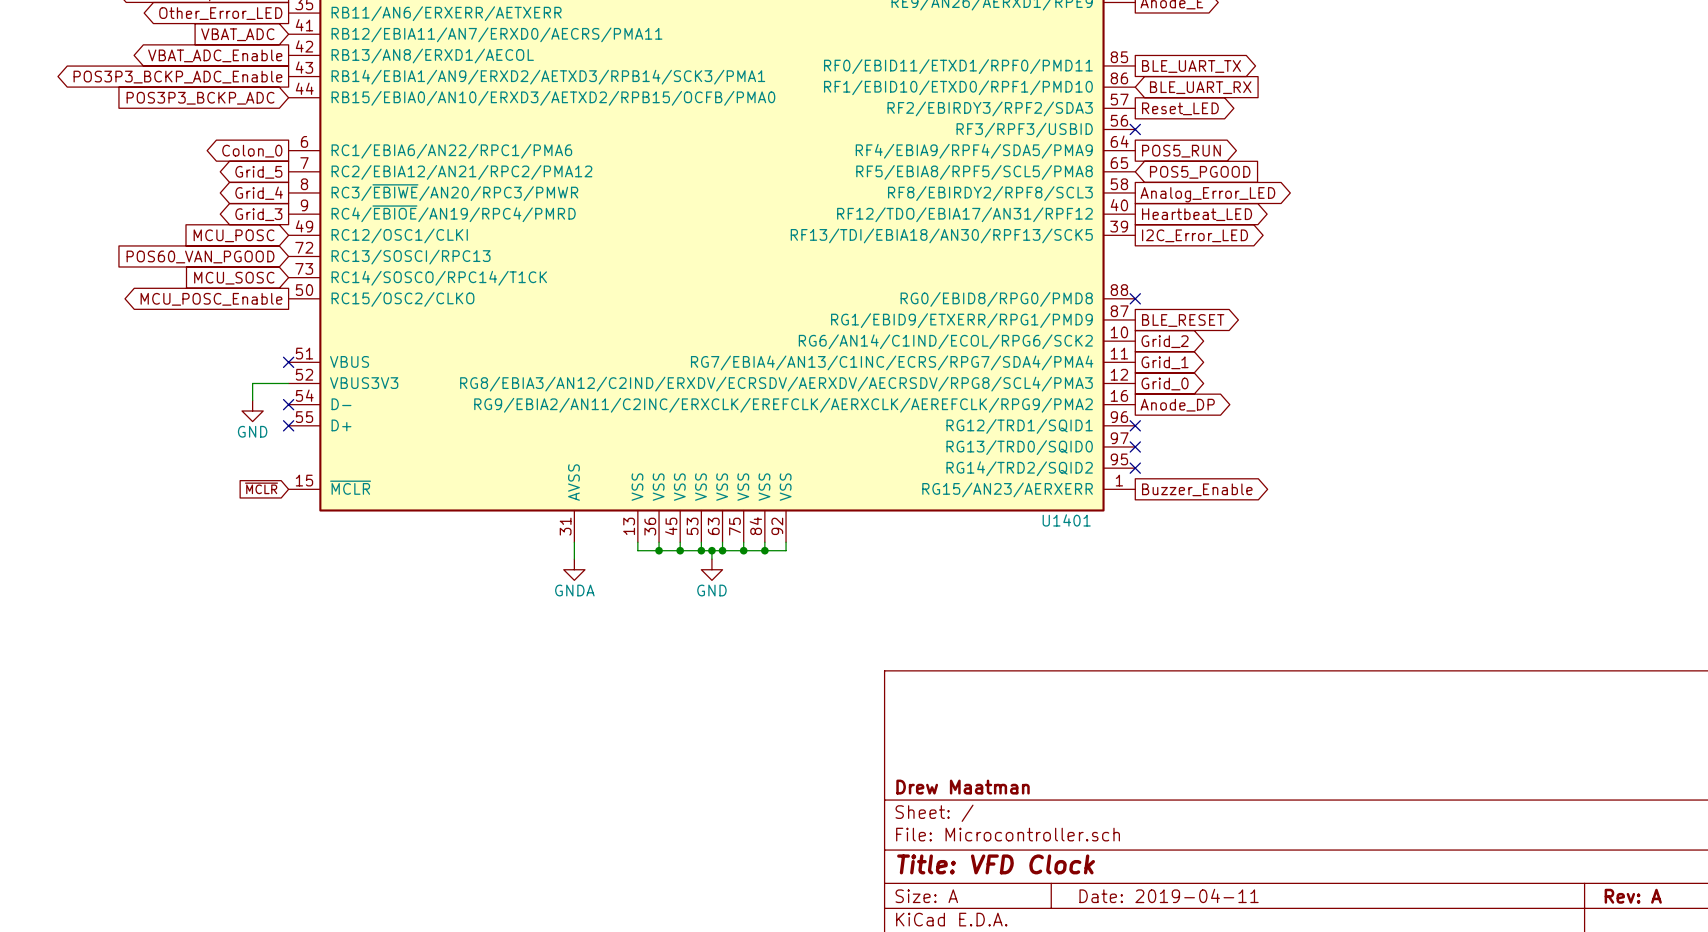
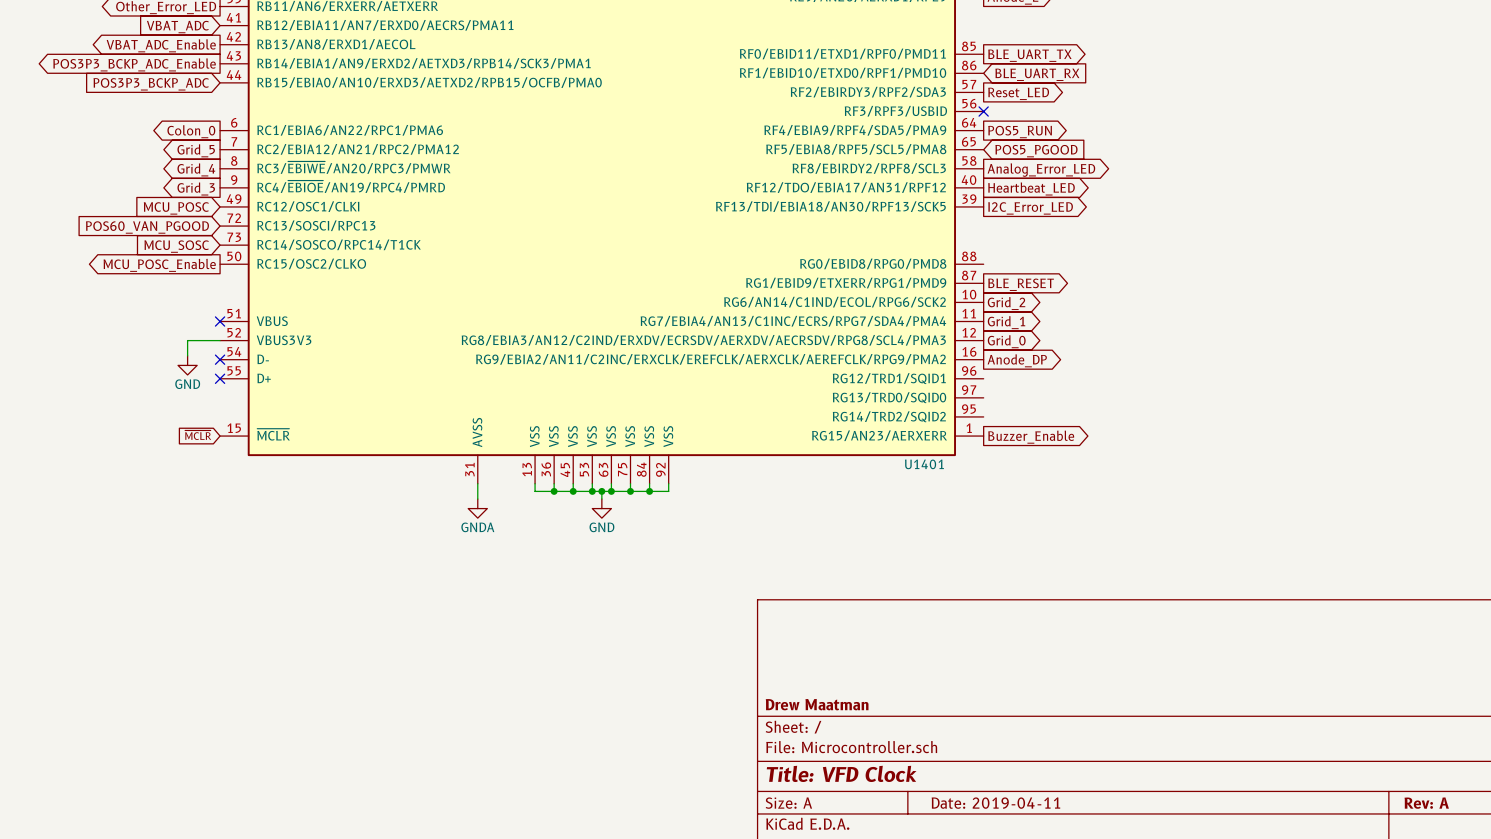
no-connect mark: (1135, 298) -> none
no-connect mark: (1135, 425) -> none
no-connect mark: (1135, 446) -> none
no-connect mark: (1135, 468) -> none

